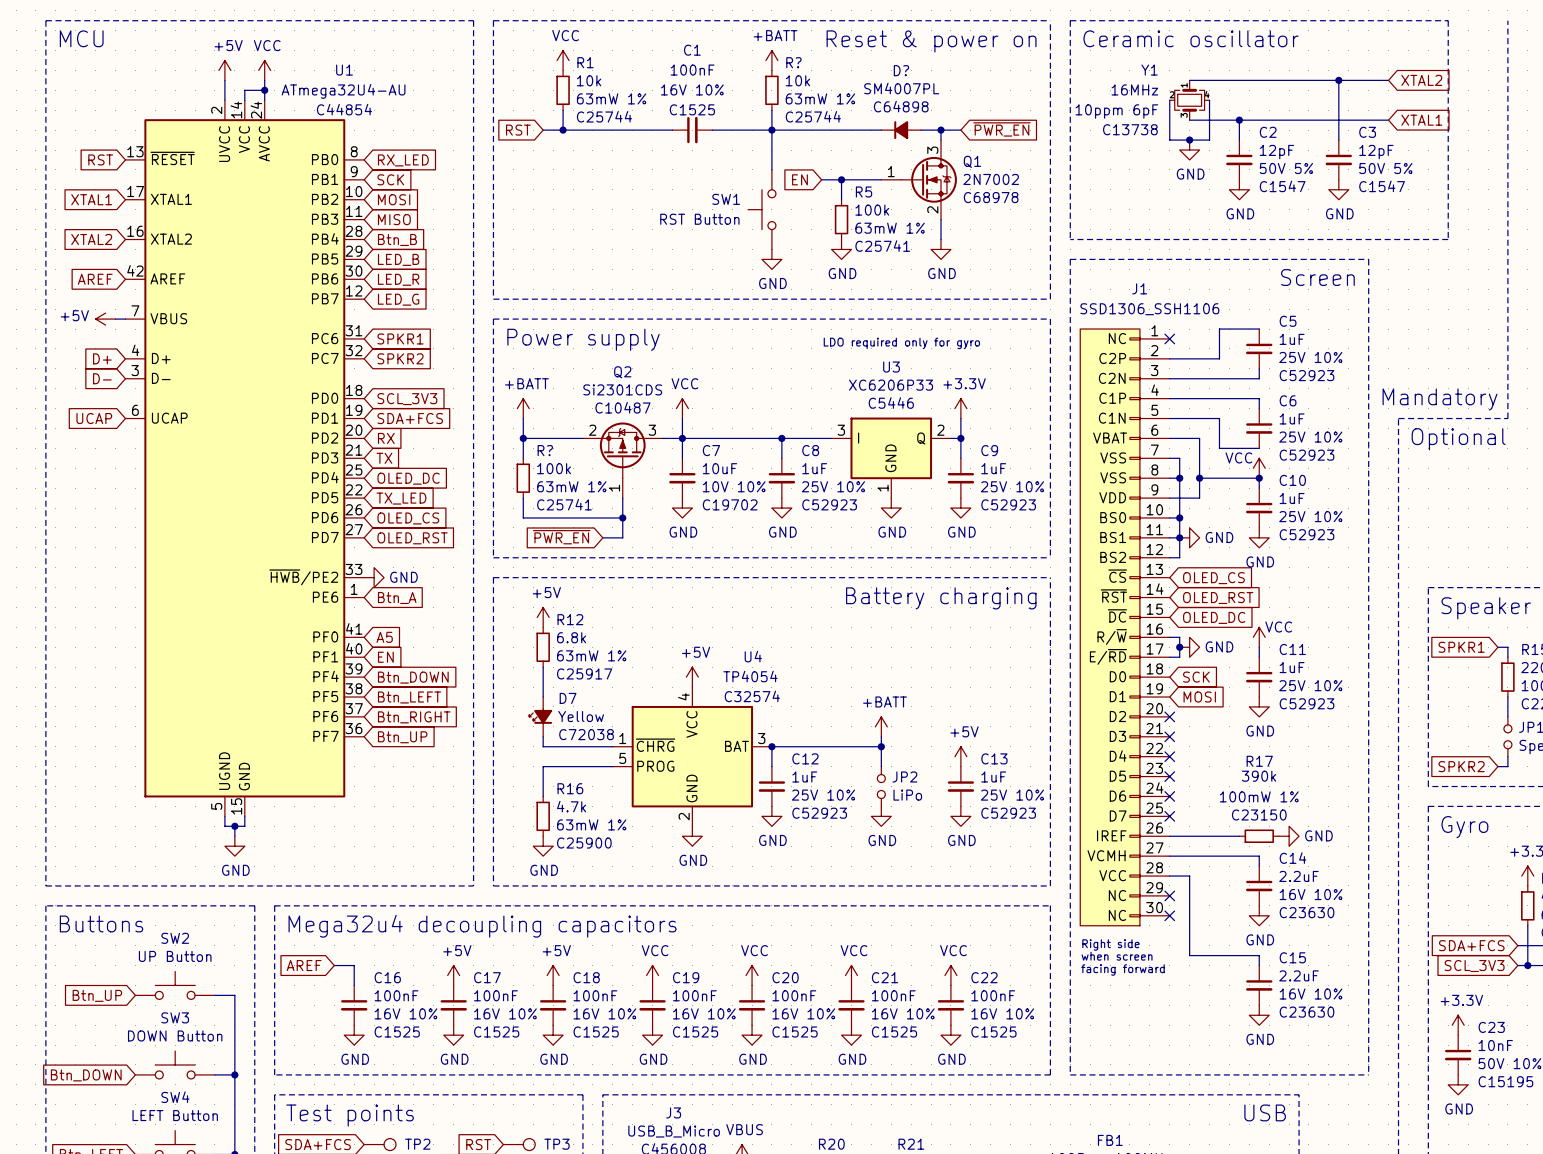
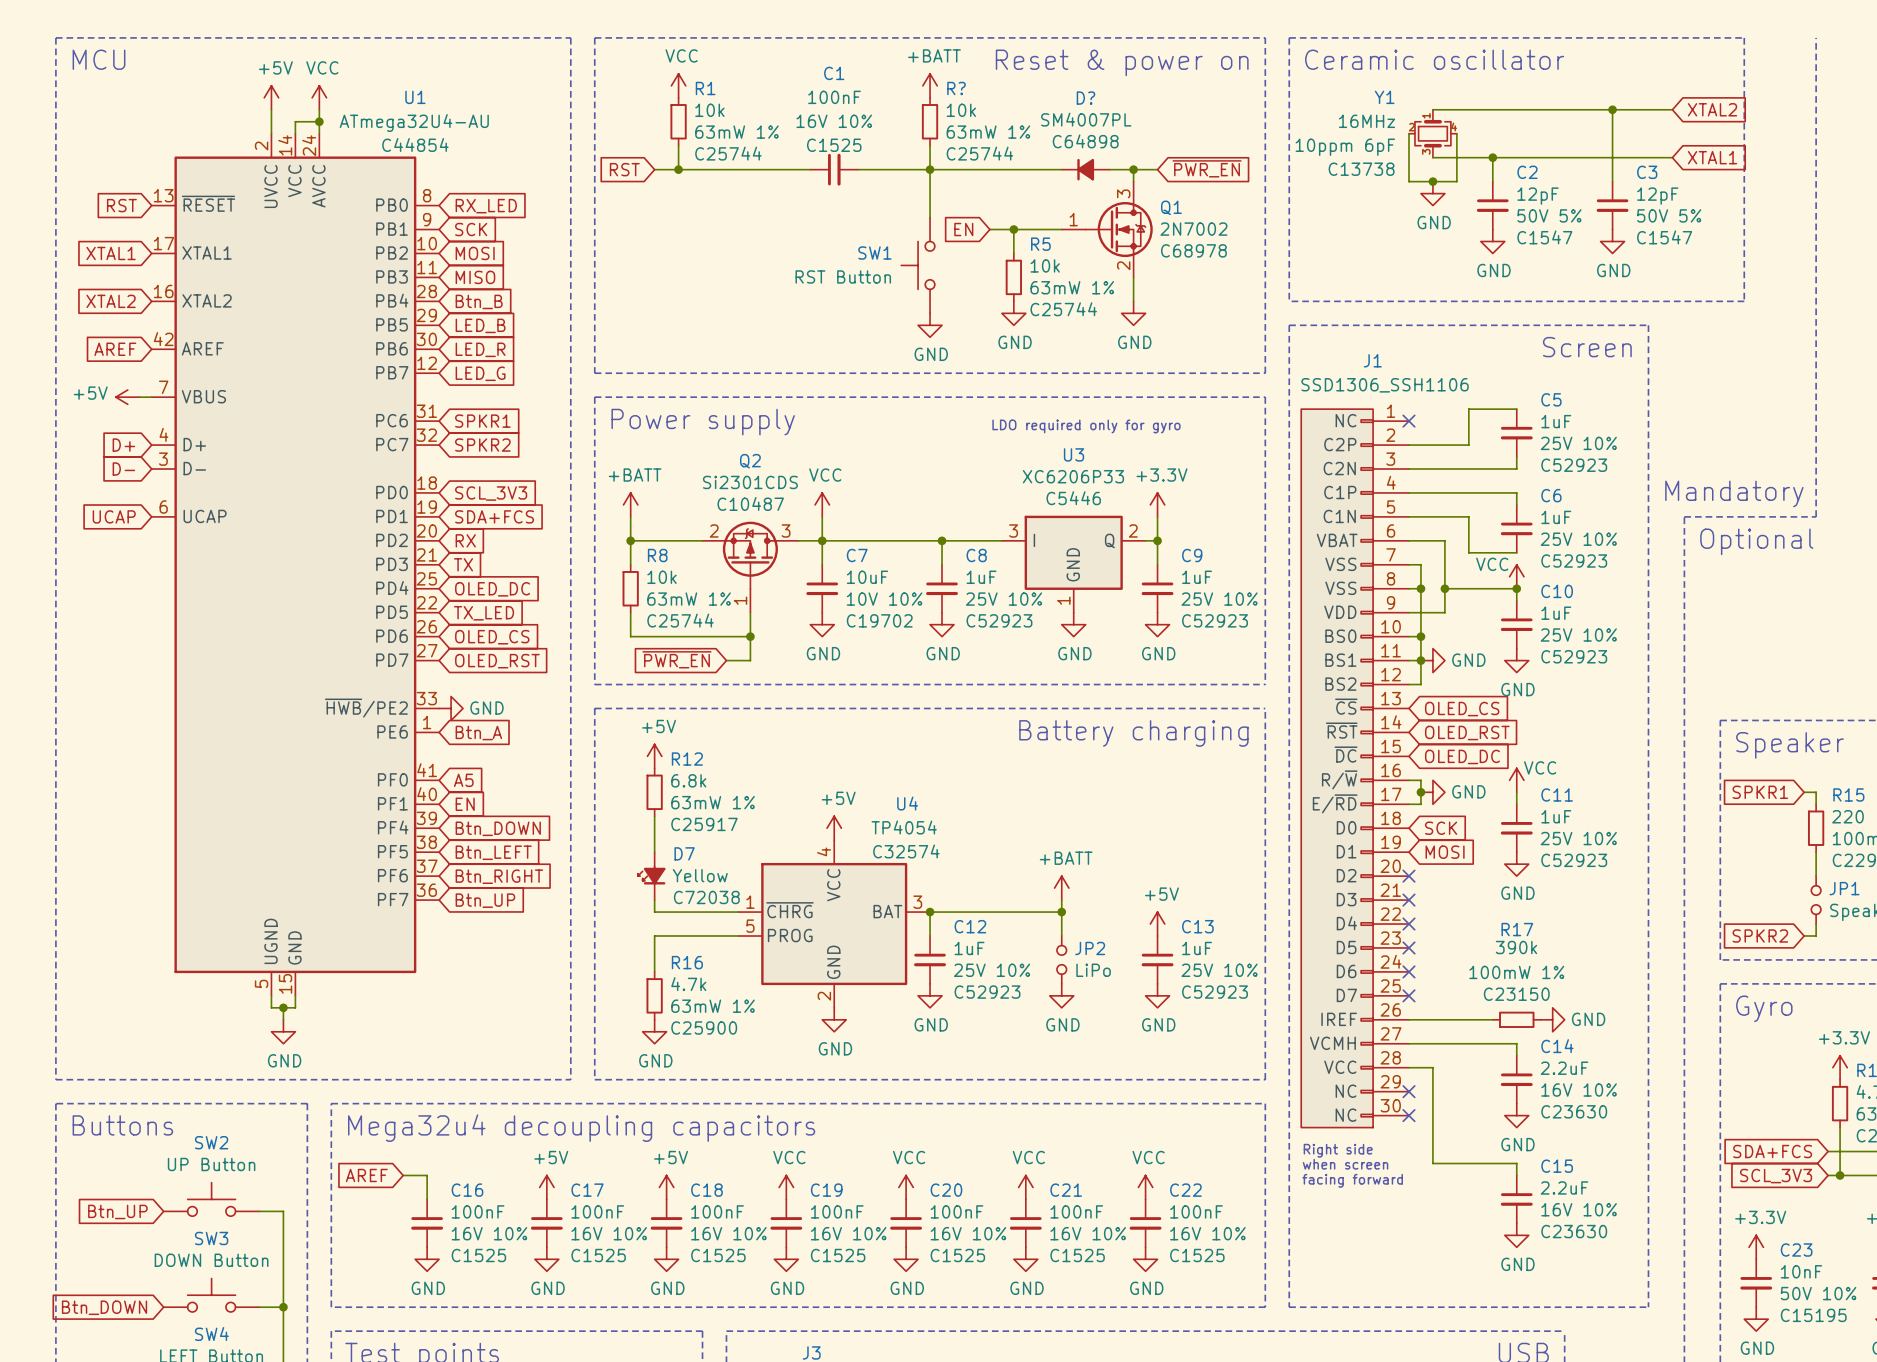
R5 value: 100k (872, 210) -> 10k (1045, 265)
R5 text: C25741 (882, 246) -> C25744 (1063, 309)
R? name: R? (545, 450) -> R8 (657, 555)
R? value: 100k (554, 468) -> 10k (662, 577)
R? text: C25741 (564, 504) -> C25744 (680, 620)

